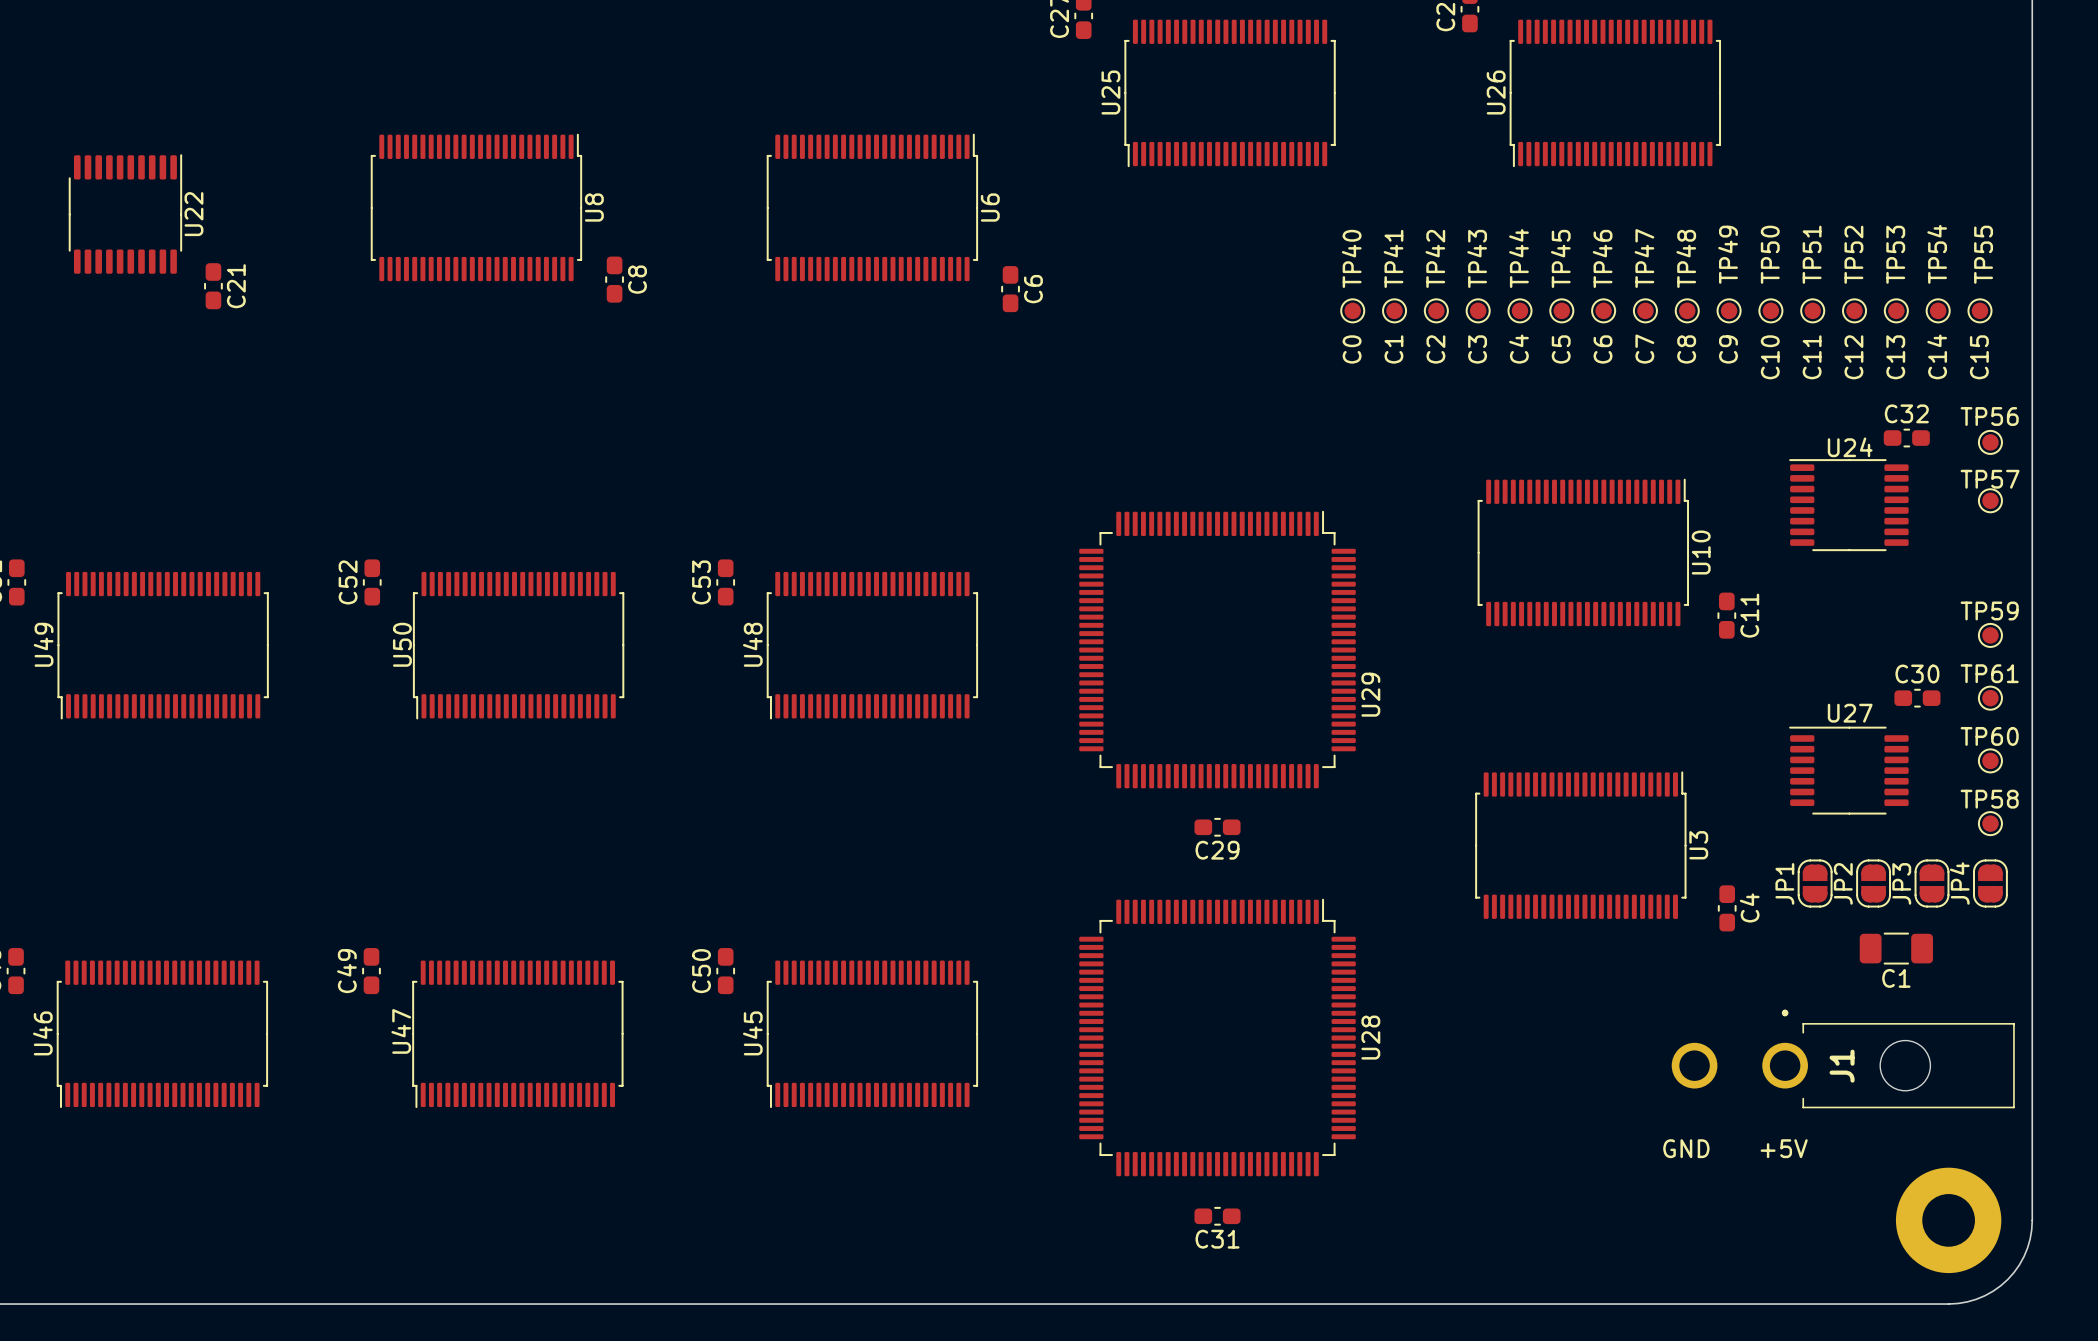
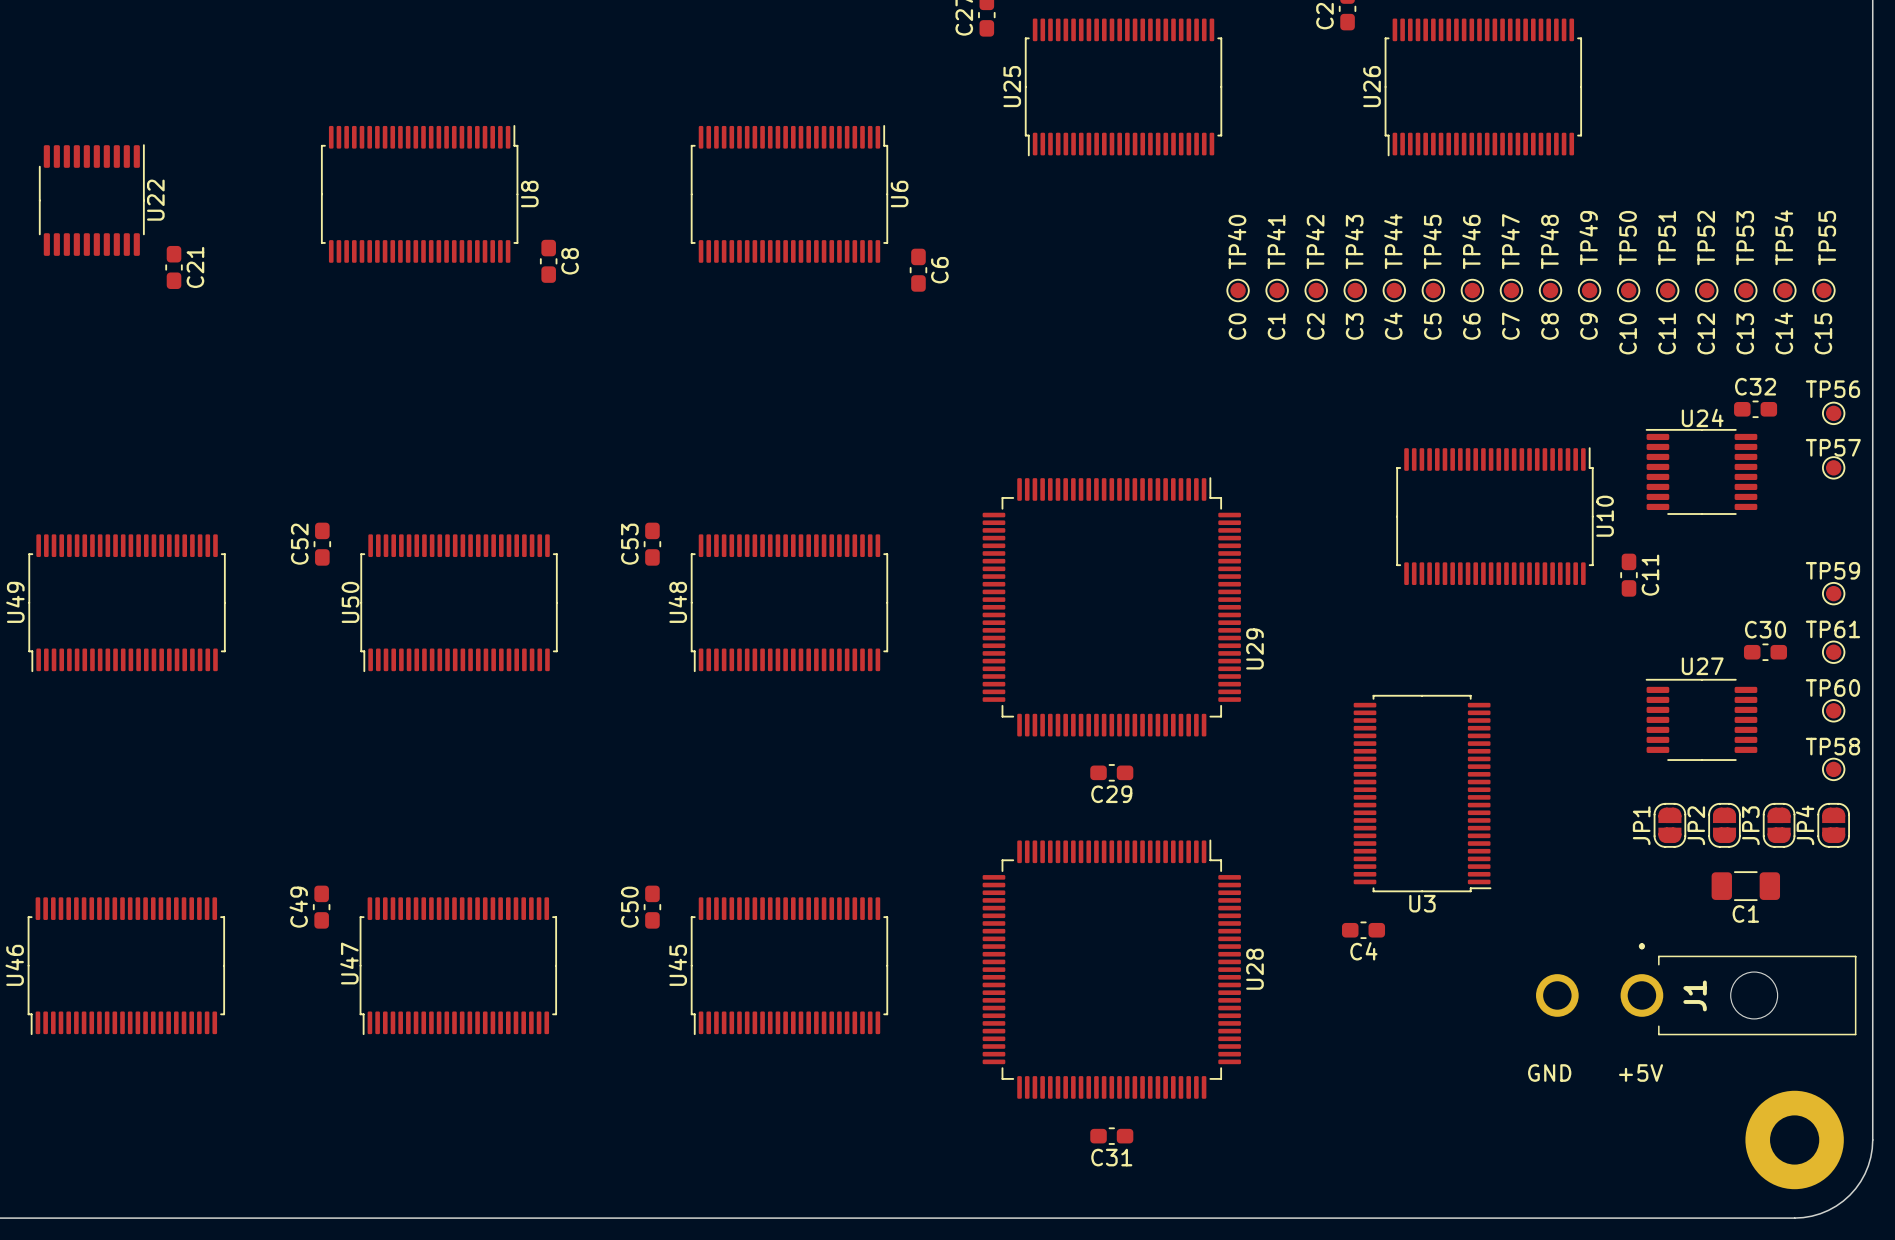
U10 position: (1583, 552) -> (1494, 516)
C11 position: (1726, 615) -> (1628, 575)
U3 rotation: 0° (1580, 845) -> 90° clockwise (1422, 793)
C4 rotation: 0° (1727, 908) -> 90° clockwise (1363, 930)
C4 position: (1727, 908) -> (1363, 930)

